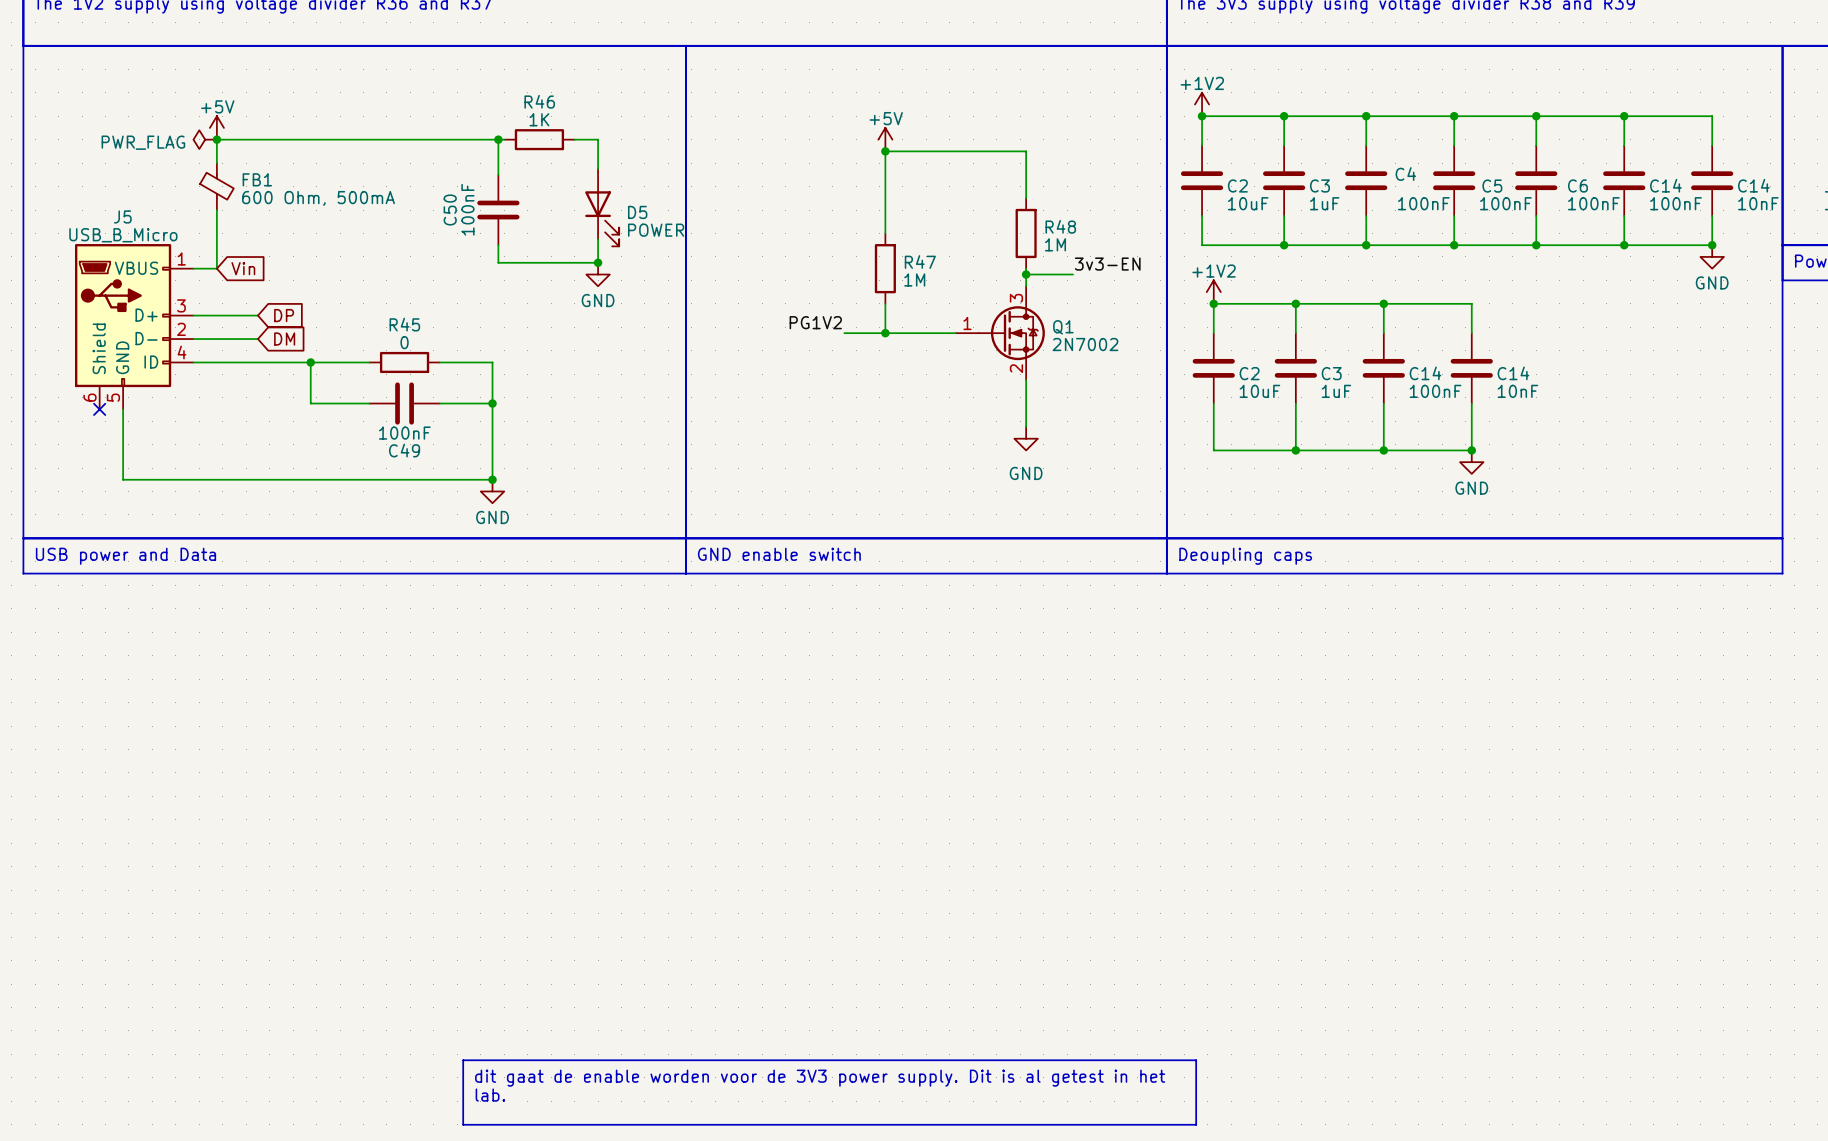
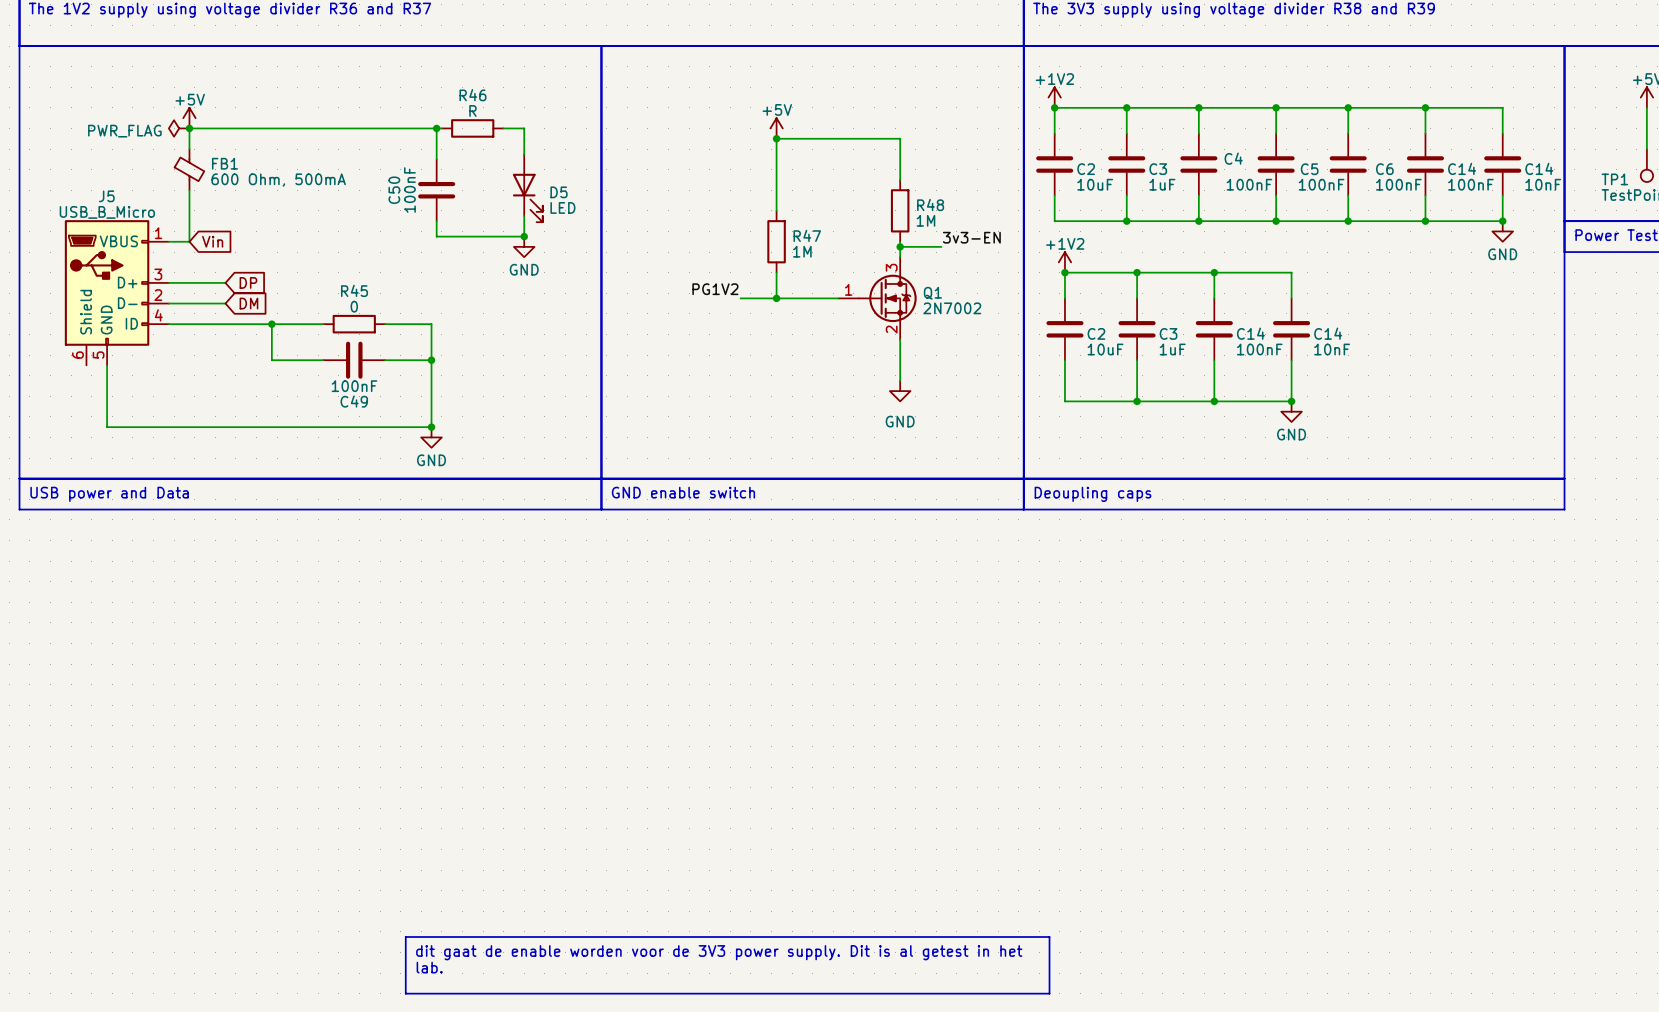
R46 value: 1K (539, 119) -> R (472, 110)
D5 value: POWER (656, 230) -> LED (562, 207)
no-connect mark: (99, 409) -> none

